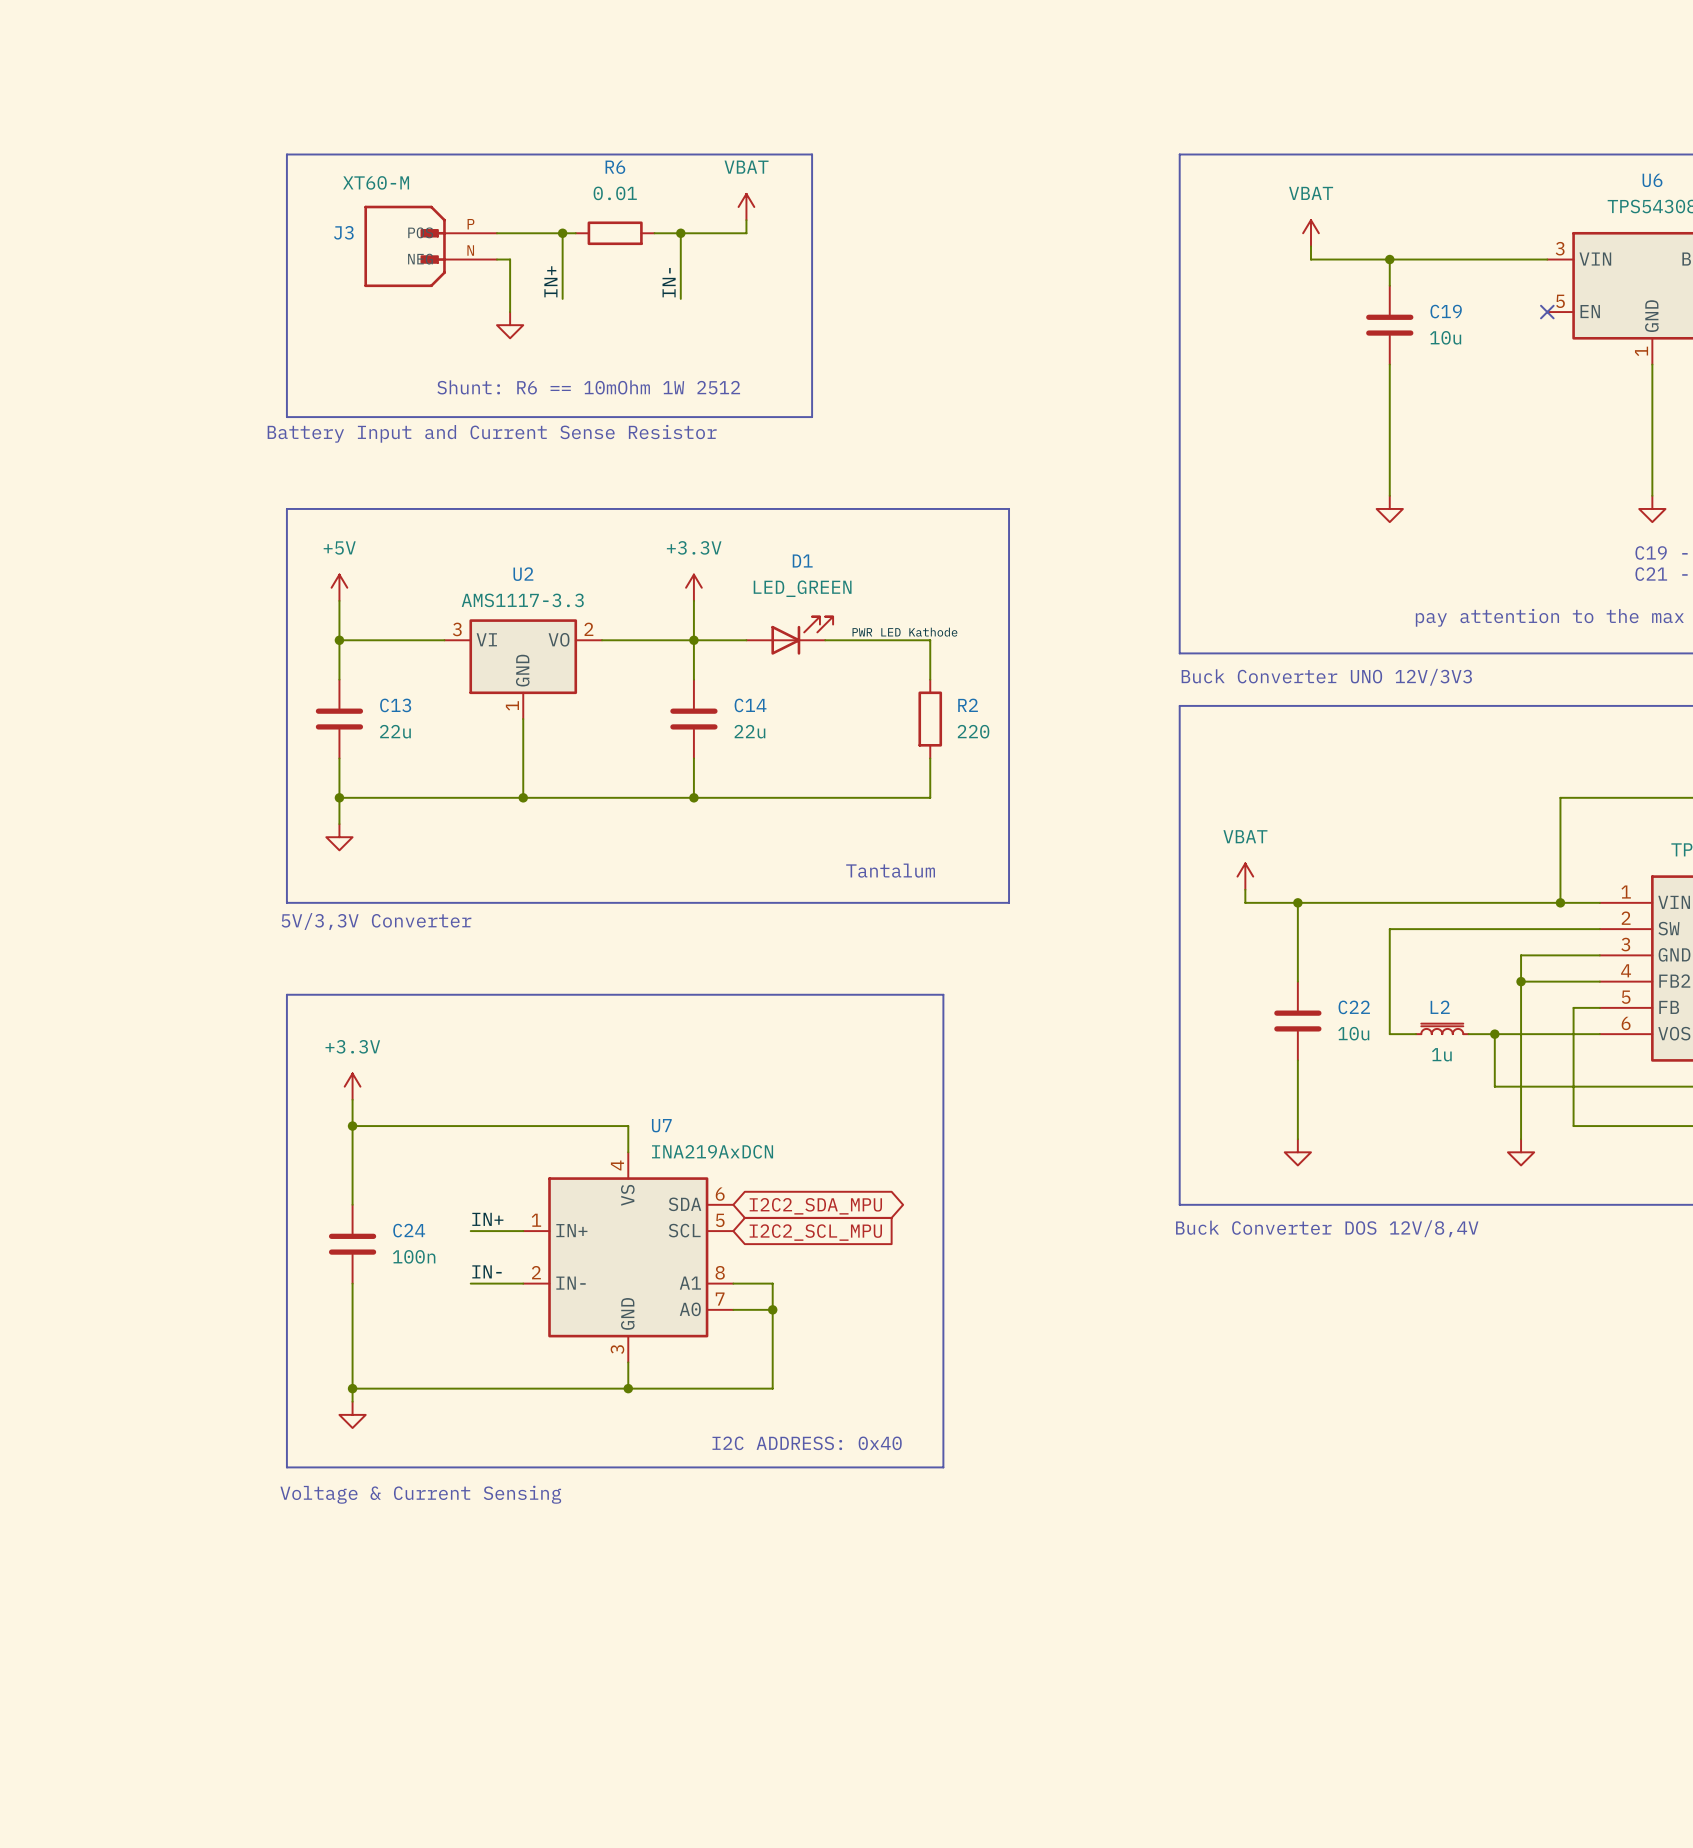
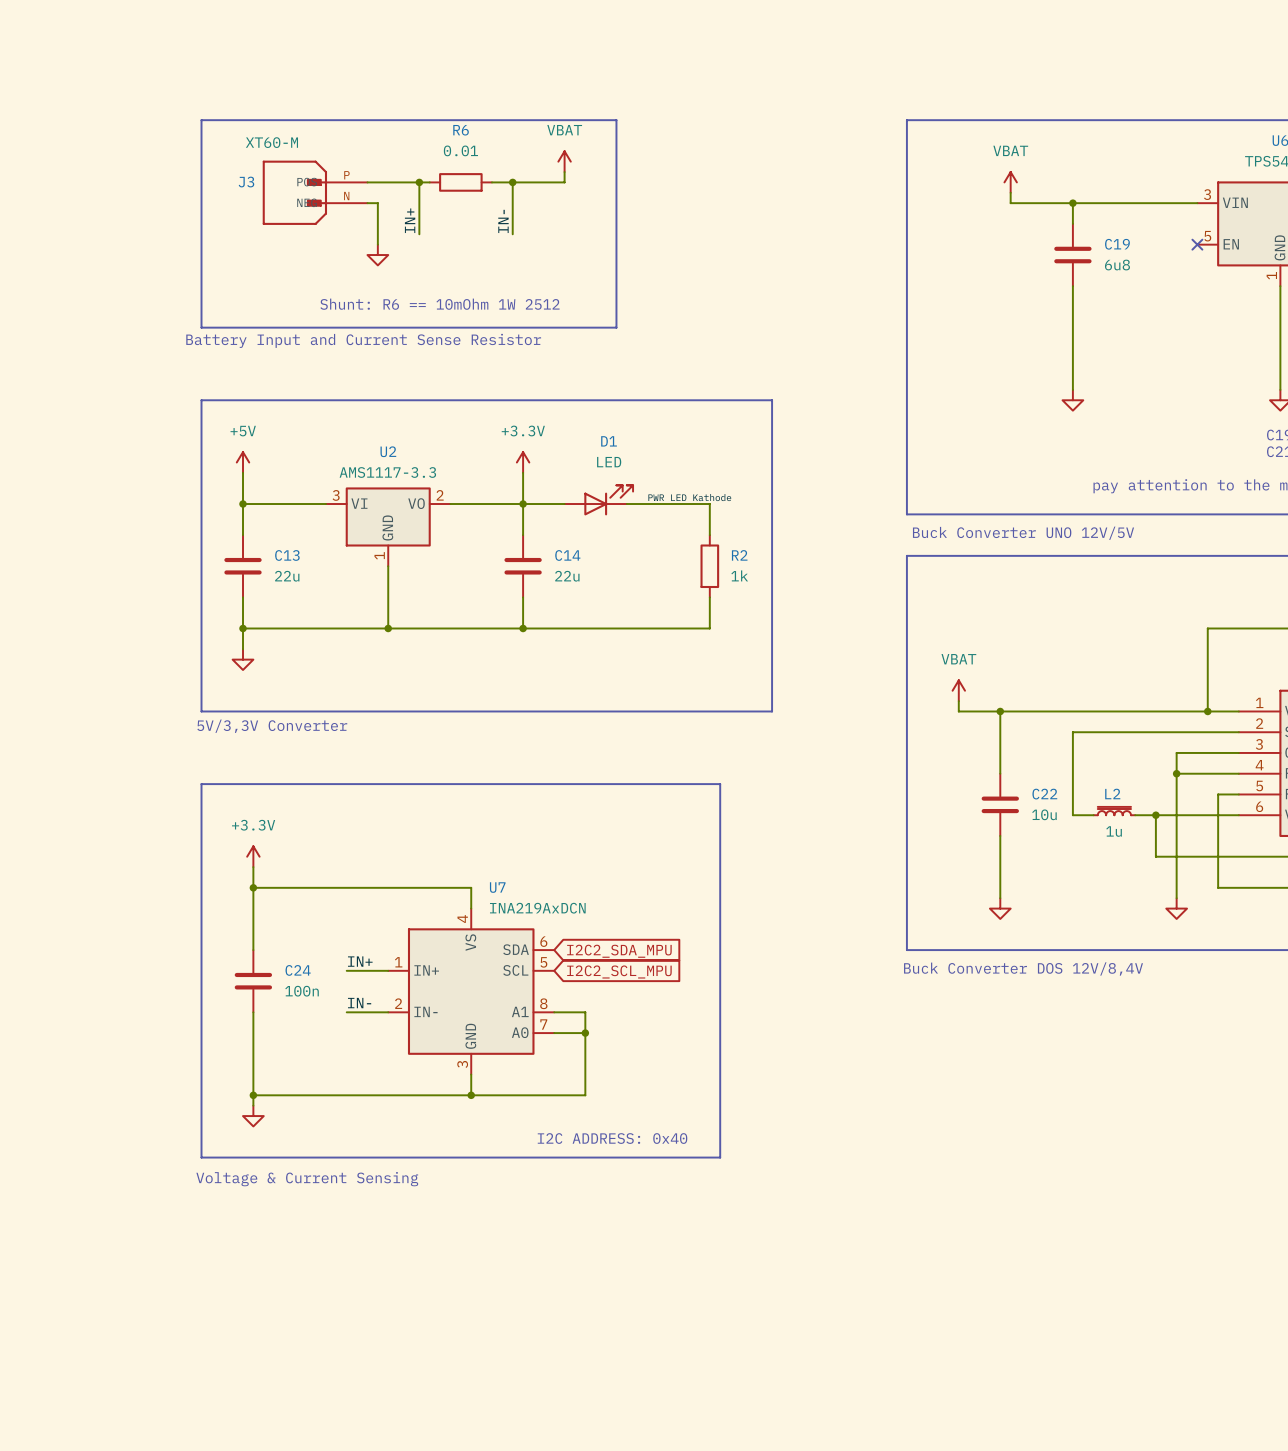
C19 value: 10u (1445, 337) -> 6u8 (1117, 265)
D1 value: LED_GREEN (802, 588) -> LED (609, 462)
text: Buck Converter UNO 12V/3V3 (1326, 677) -> Buck Converter UNO 12V/5V (1023, 533)
R2 value: 220 (973, 731) -> 1k (739, 575)
text: Tantalum (890, 870) -> none
global label shape: bidirectional (815, 1206) -> input (619, 951)

